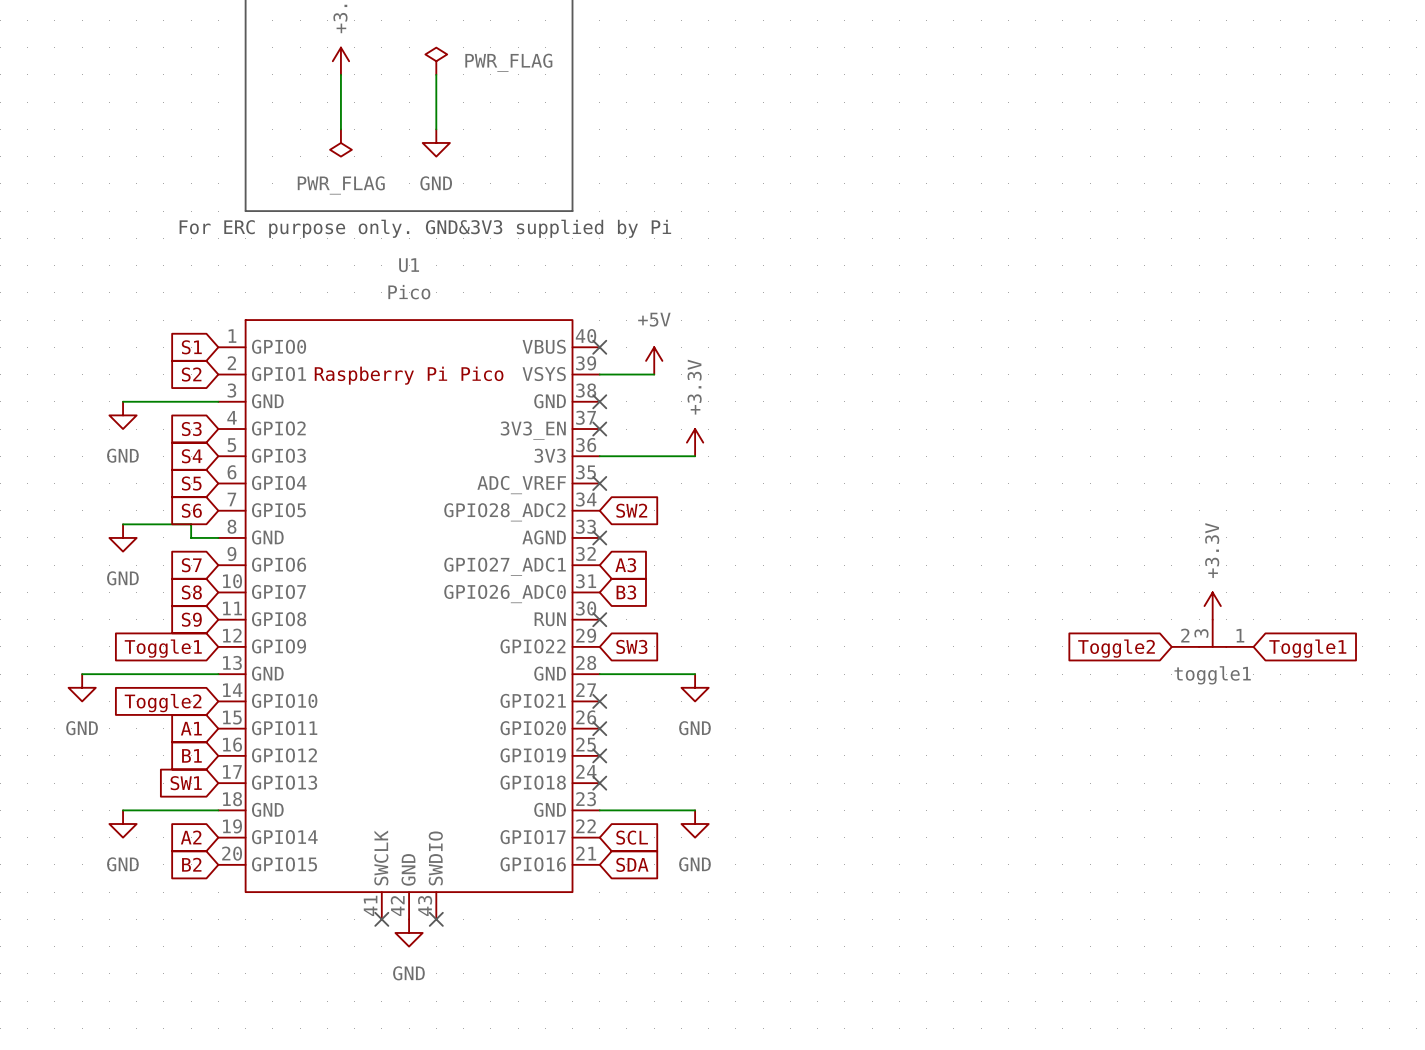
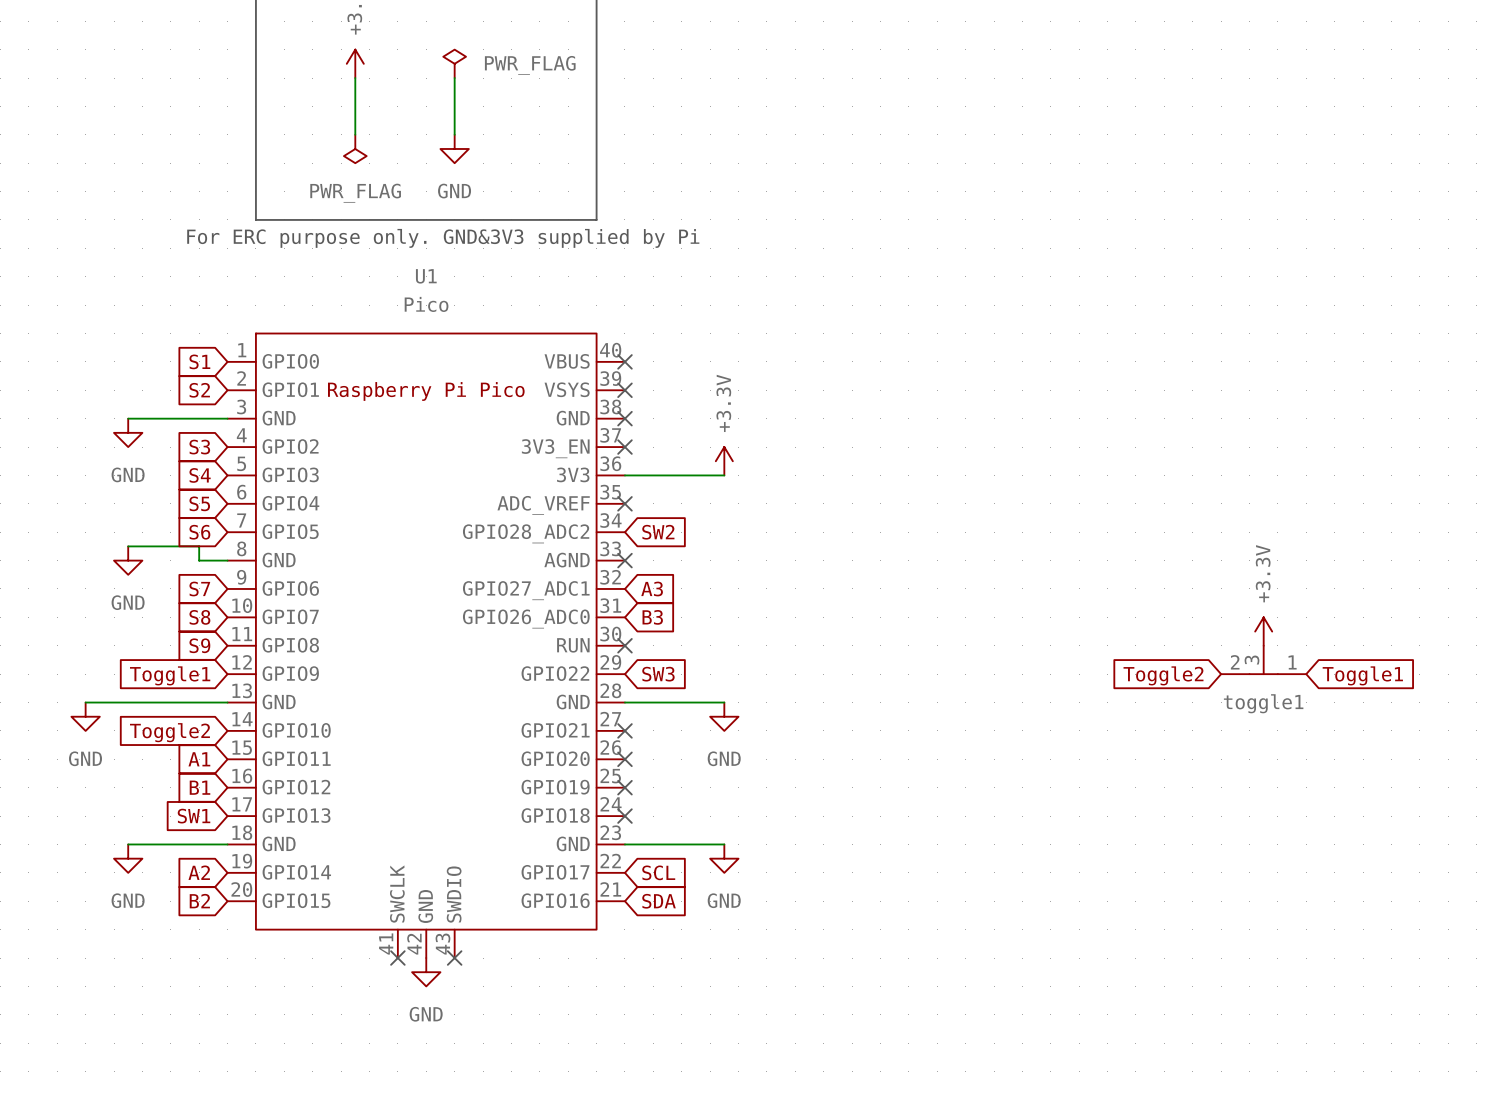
power symbol: +5V (654, 360) -> none
wire: (599, 374) (654, 374) -> none
no-connect mark: none -> (624, 390)

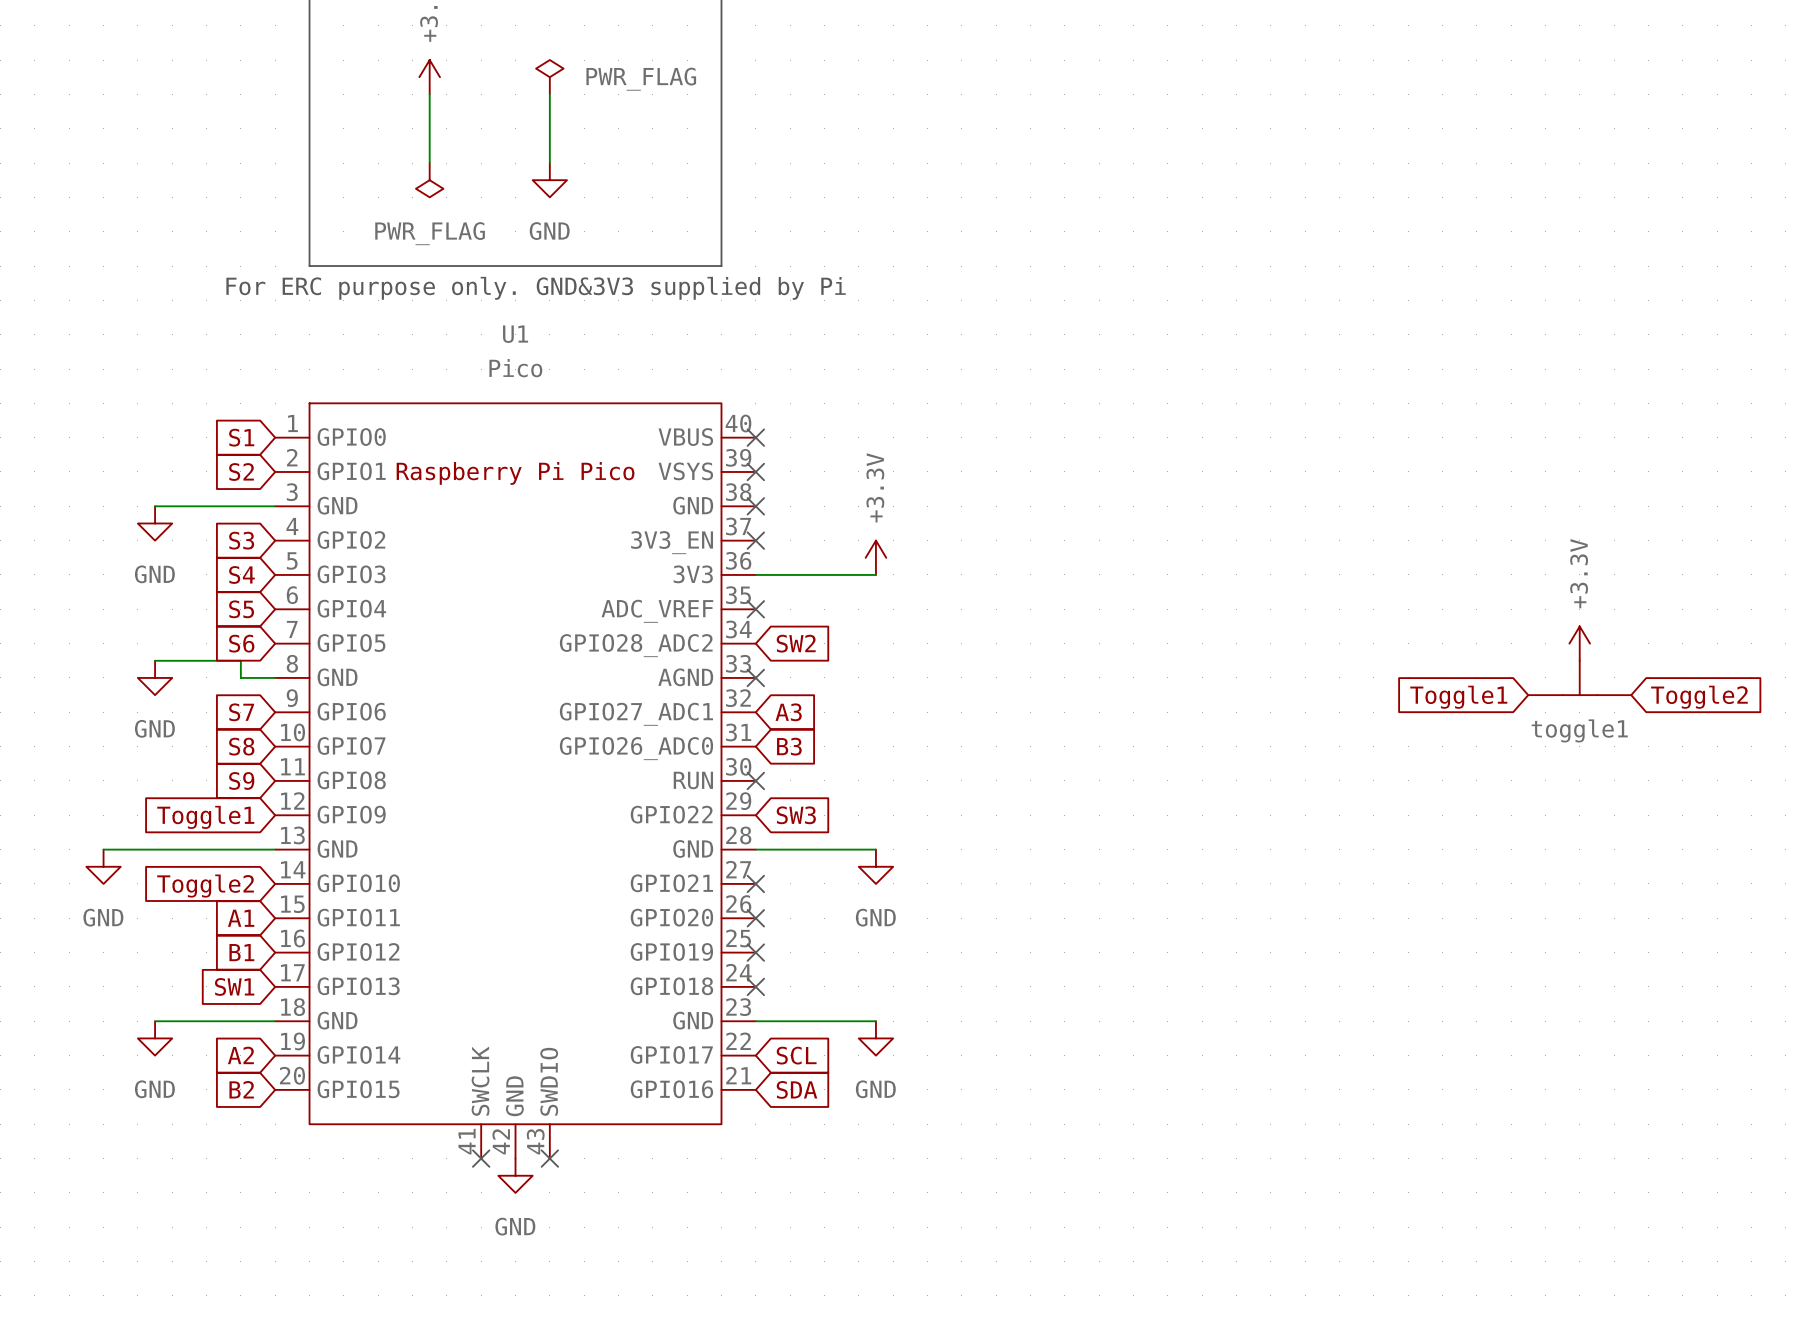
power symbol position: +3.3V (1263, 631) -> +3.3V (1579, 643)
toggle1 position: (1263, 659) -> (1579, 677)
toggle1 pin number: 3 (1251, 660) -> none
toggle1 pin number: 2 (1235, 662) -> none
toggle1 pin number: 1 (1292, 662) -> none
global label rotation: 0° (1163, 675) -> 180° (1699, 697)
global label position: Toggle2 (1163, 675) -> Toggle2 (1699, 697)
global label rotation: 0° (1362, 675) -> 180° (1458, 697)
global label position: Toggle1 (1362, 675) -> Toggle1 (1458, 697)

